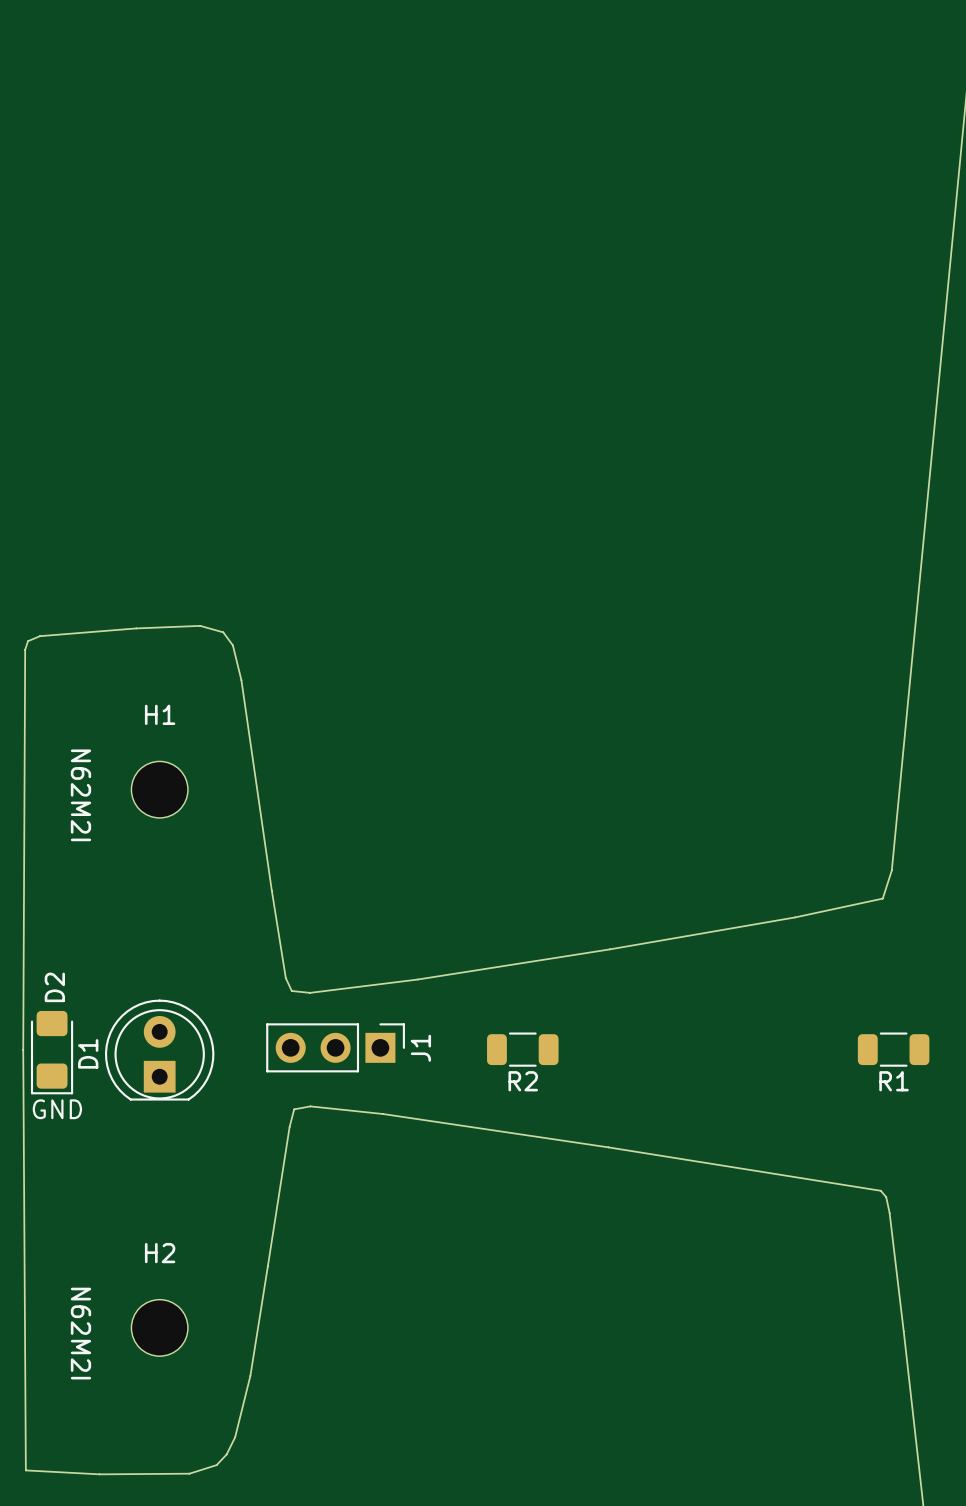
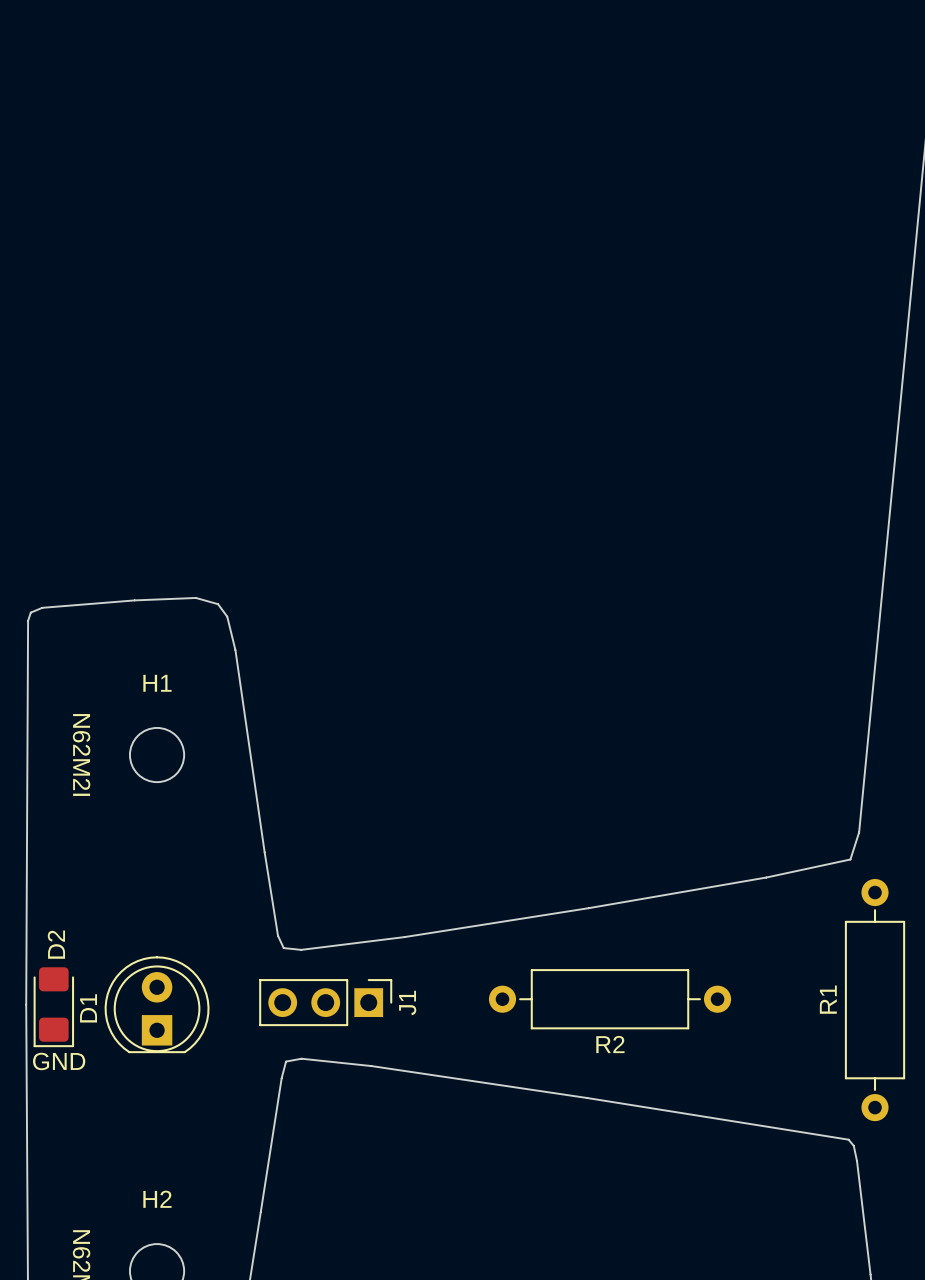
R2 footprint: [487, 1032, 559, 1067] -> [488, 969, 732, 1030]
R1 footprint: [857, 1032, 930, 1067] -> [844, 878, 906, 1122]
R1 name position: R1 (894, 1081) -> R1 (828, 999)

